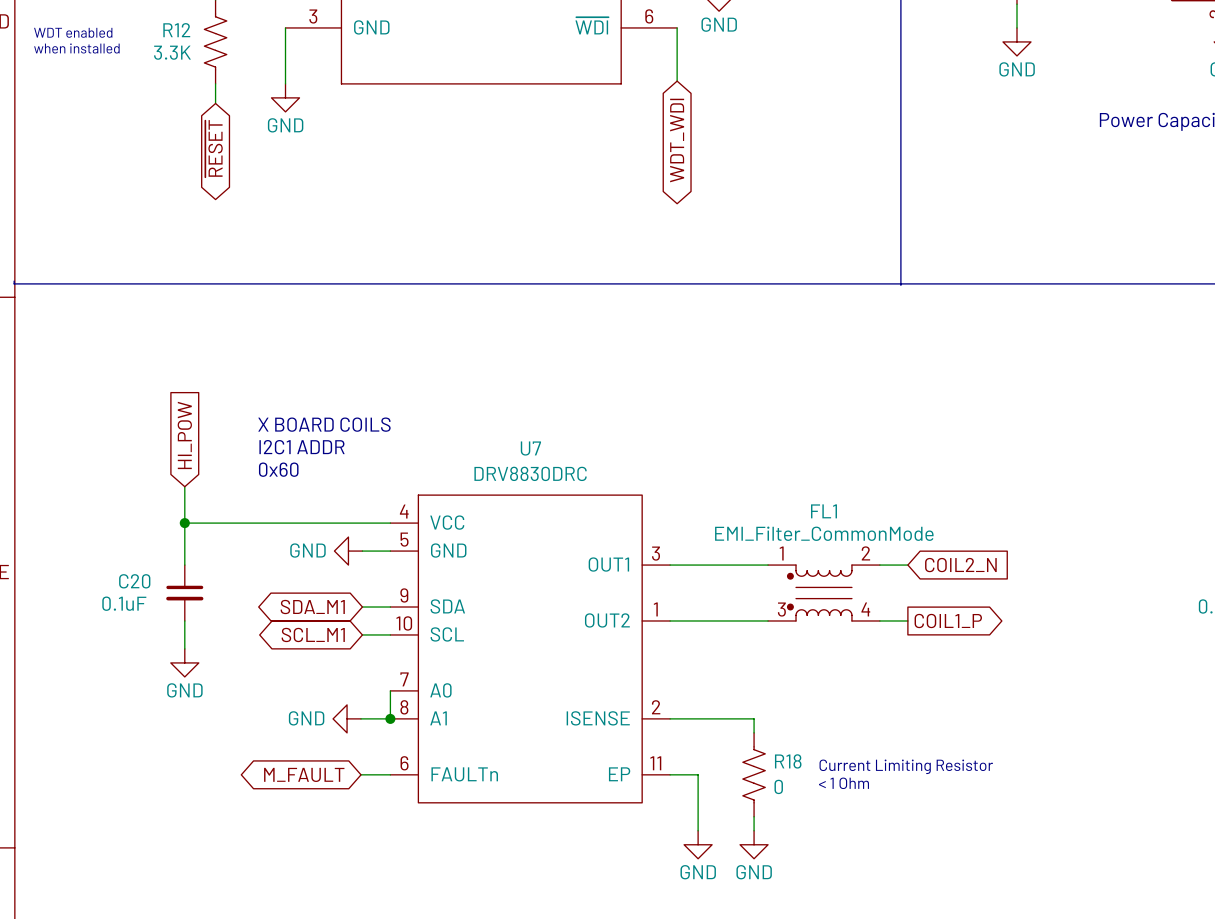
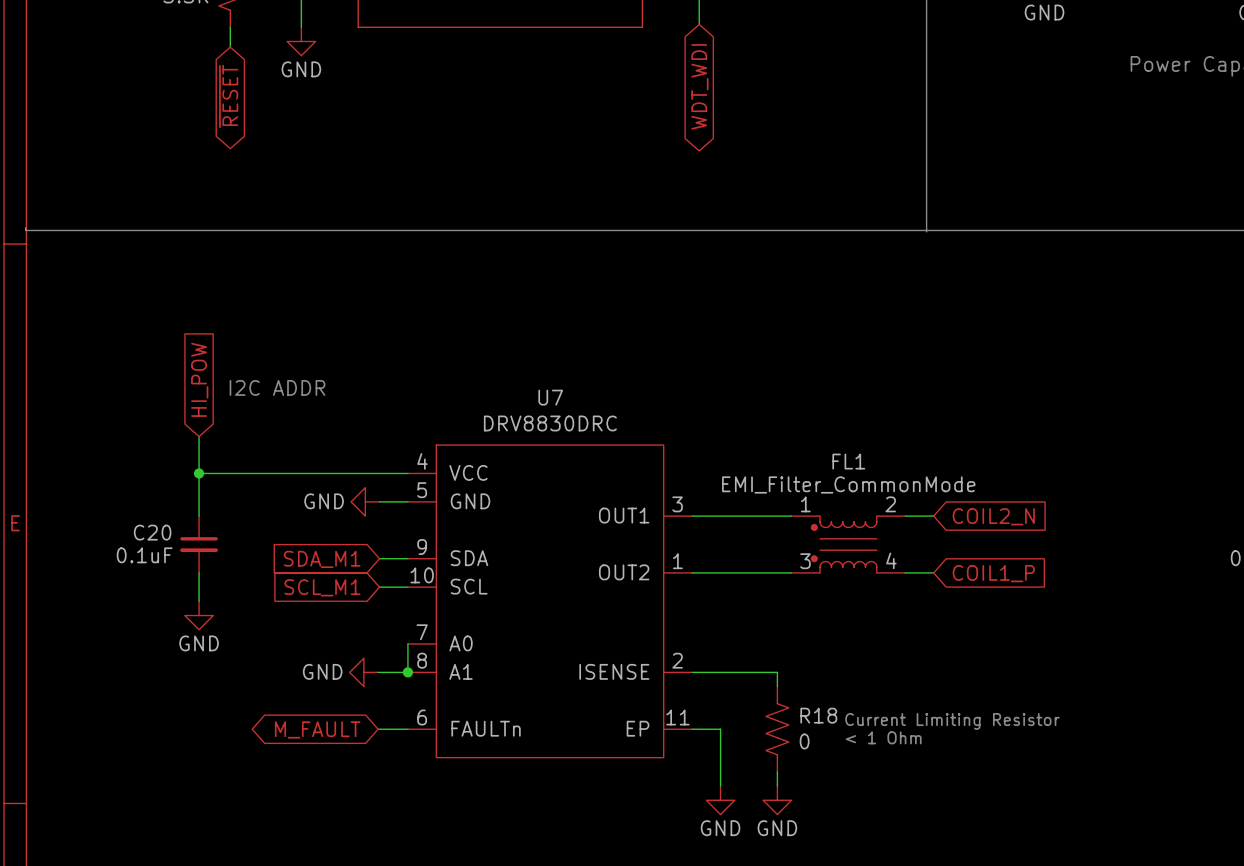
text: X BOARD COILS (324, 424) -> none
text: I2C1 ADDR (302, 447) -> I2C ADDR (277, 387)
text: 0x60 (278, 469) -> none
global label shape: bidirectional (312, 607) -> input (322, 559)
global label shape: output (948, 621) -> input (993, 573)
global label shape: bidirectional (313, 634) -> input (322, 587)

